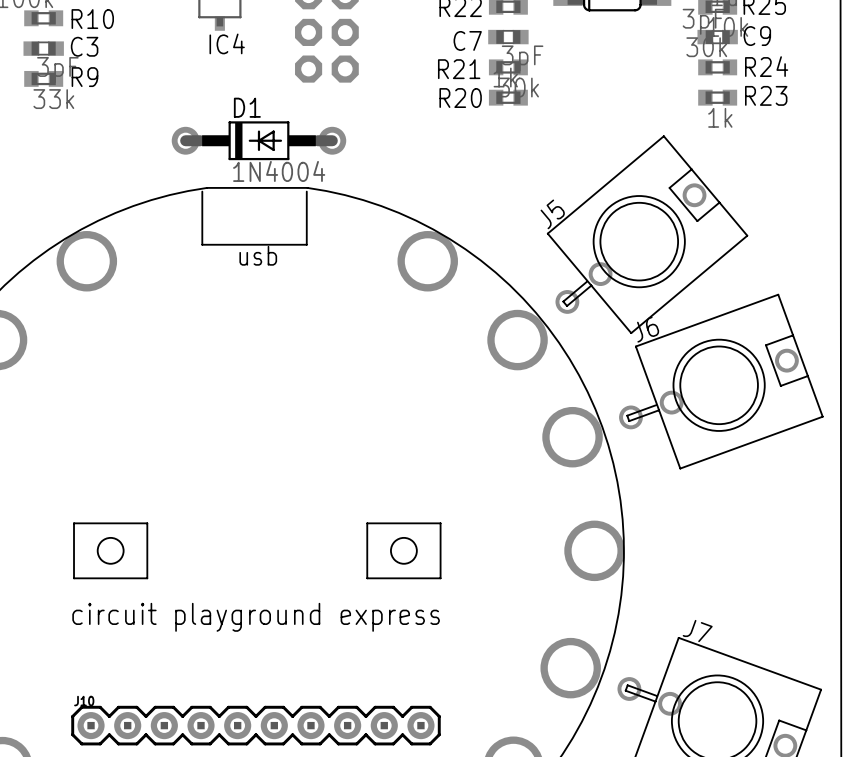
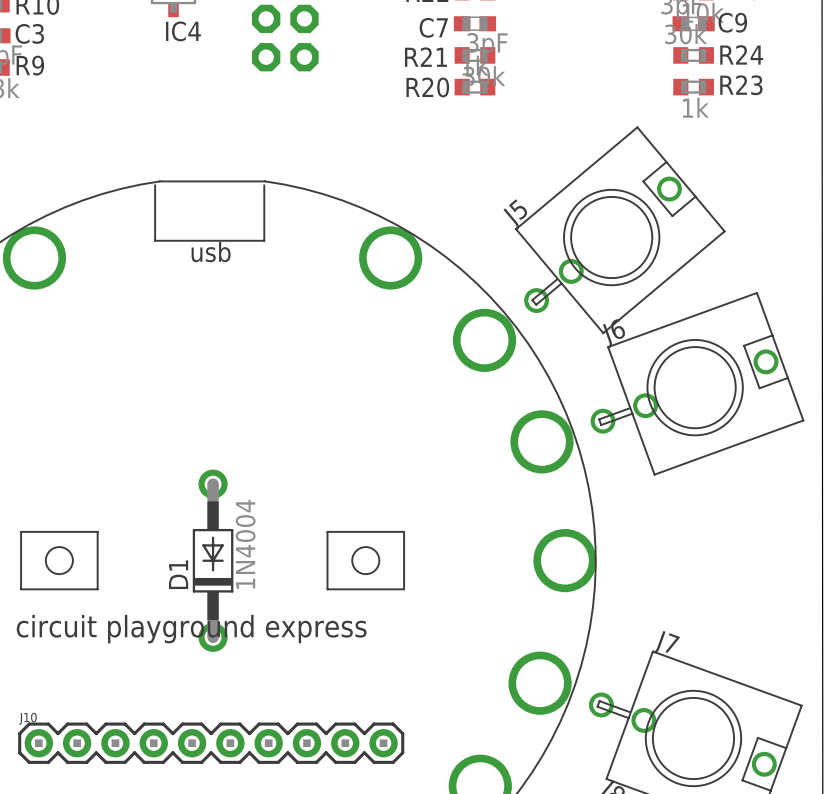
D1 rotation: 0° (258, 140) -> 90° counterclockwise (213, 560)
D1 position: (258, 140) -> (213, 560)

